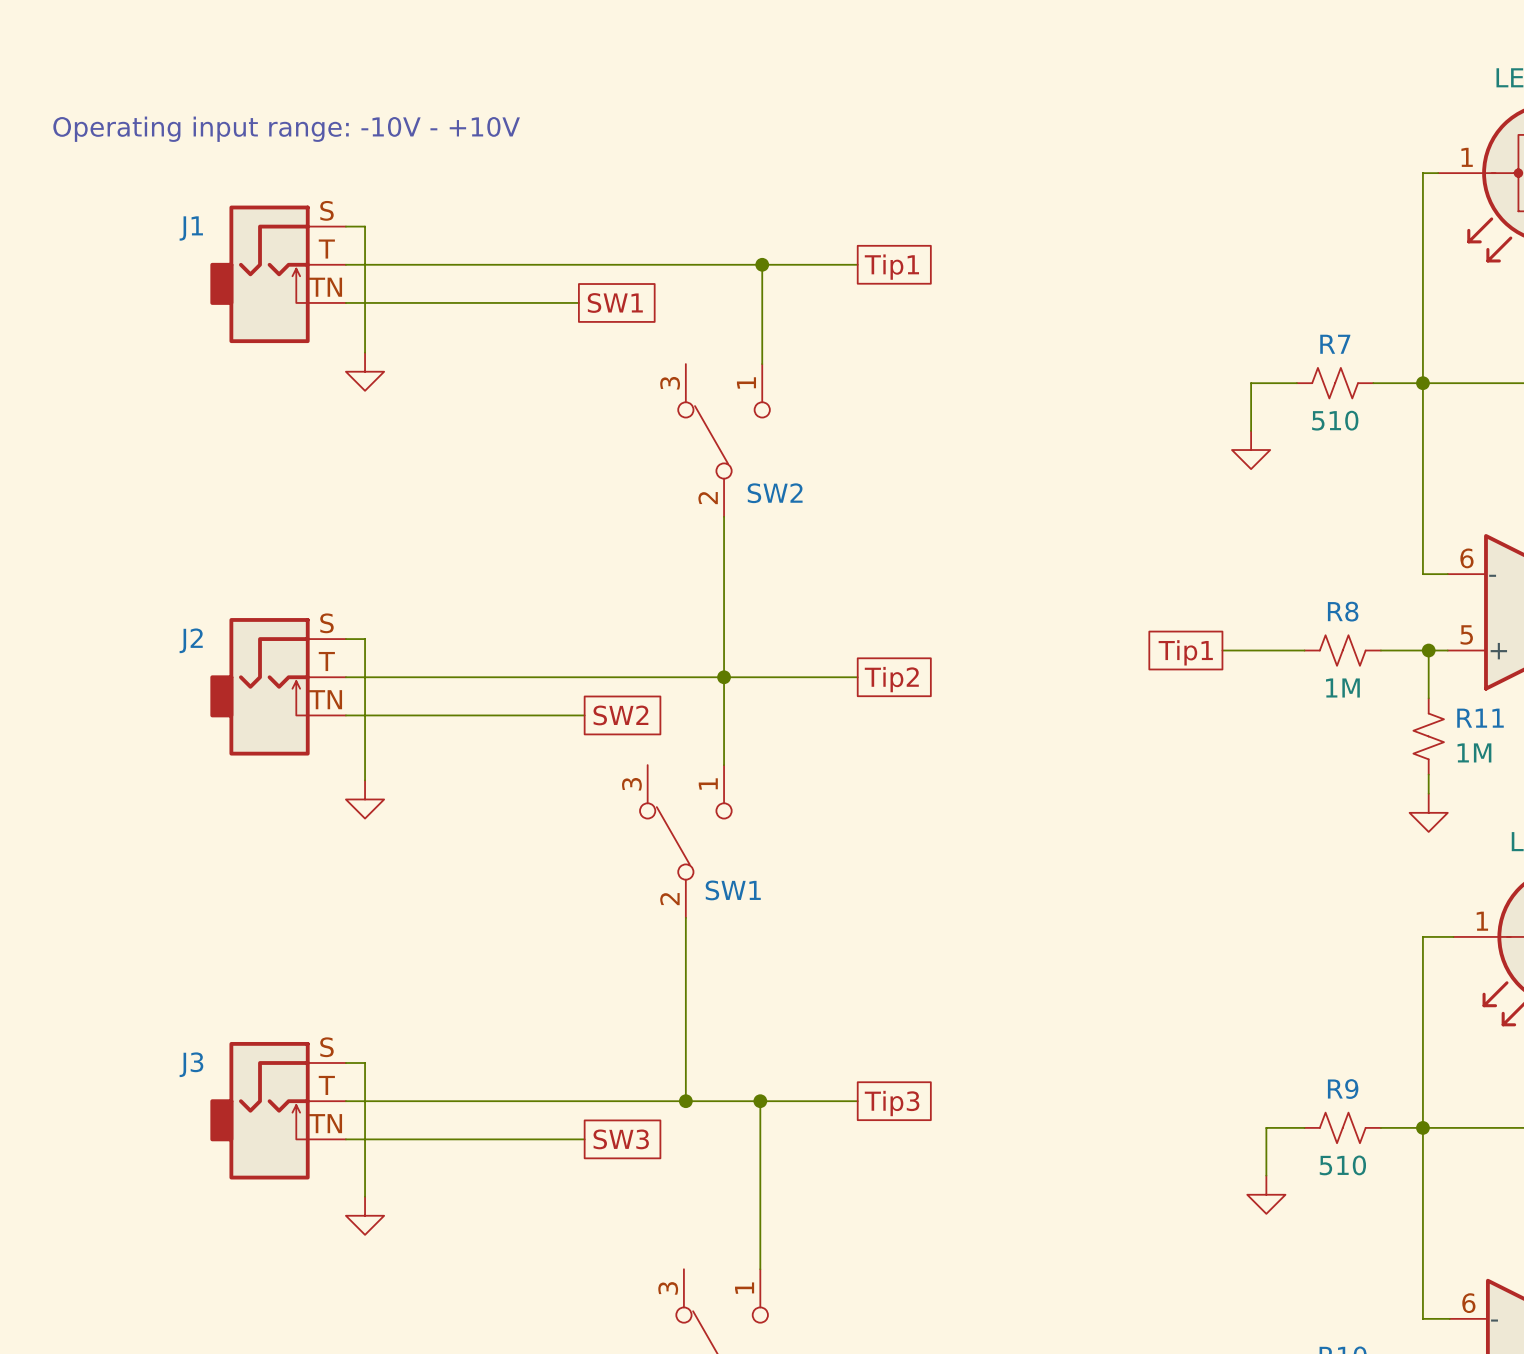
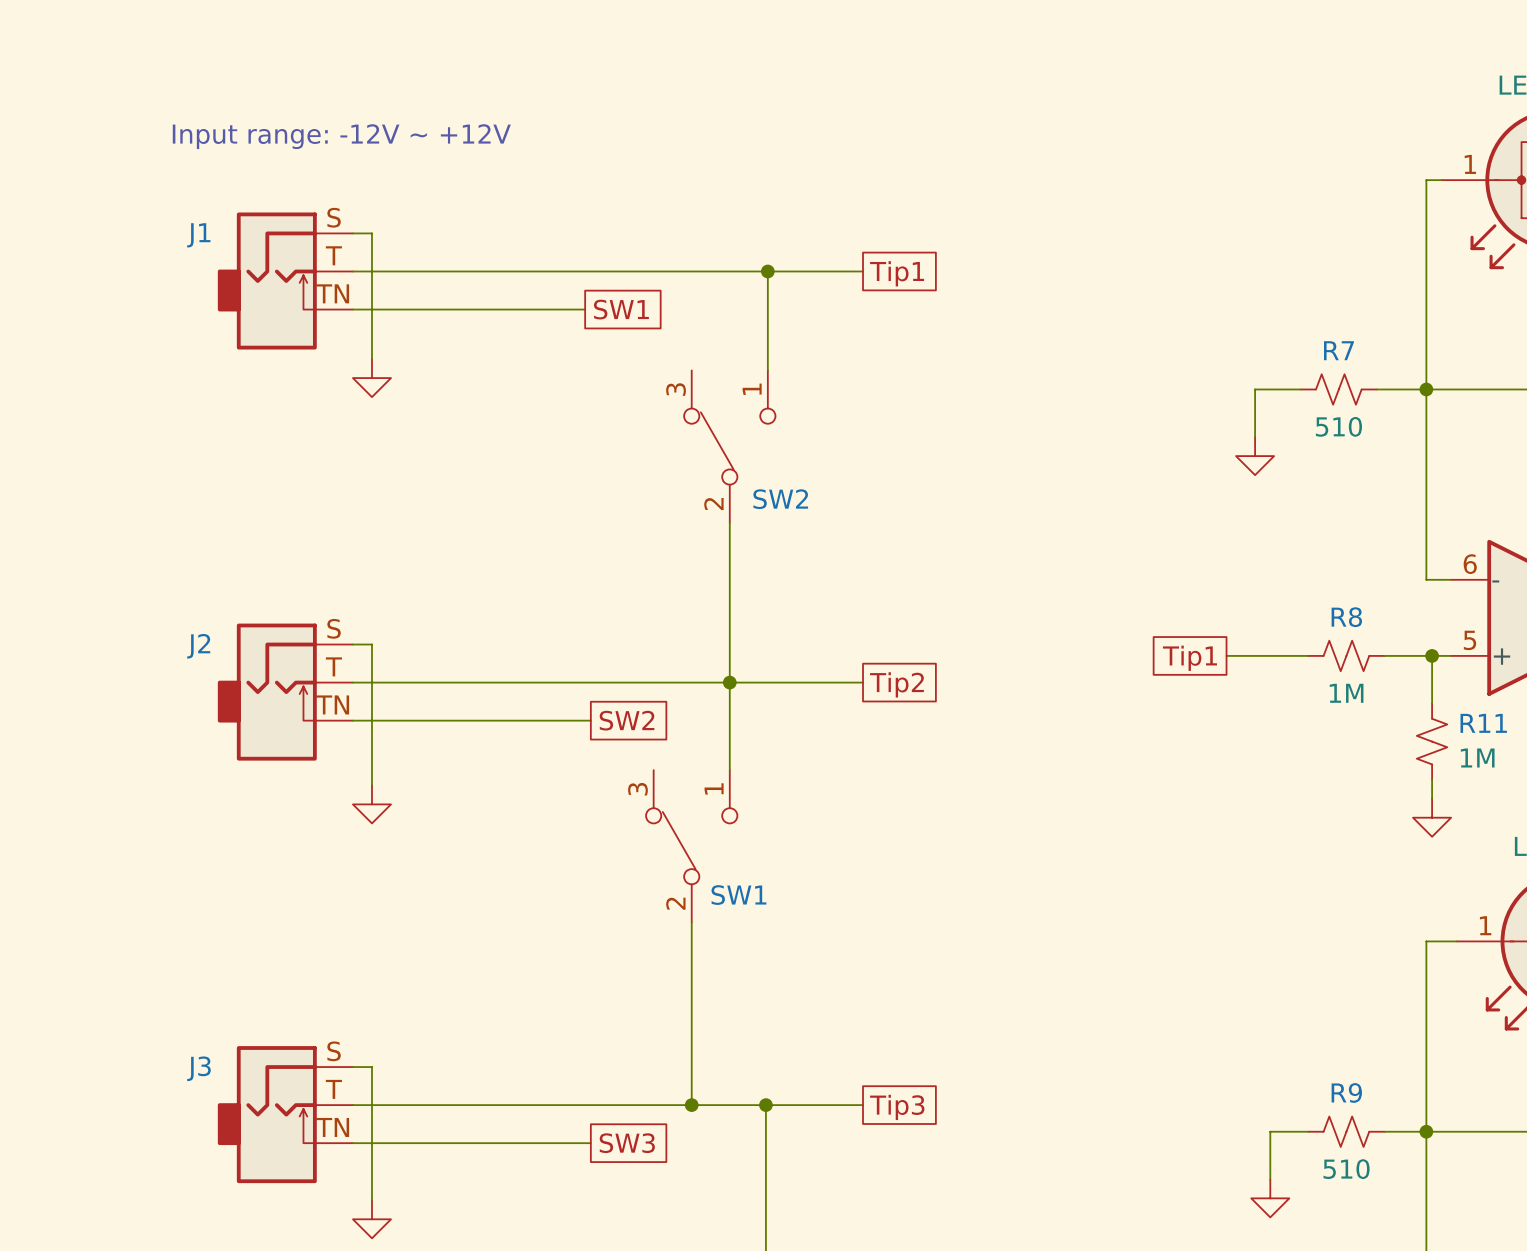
text: Operating input range: -10V - +10V (286, 129) -> Input range: -12V ~ +12V (341, 136)

